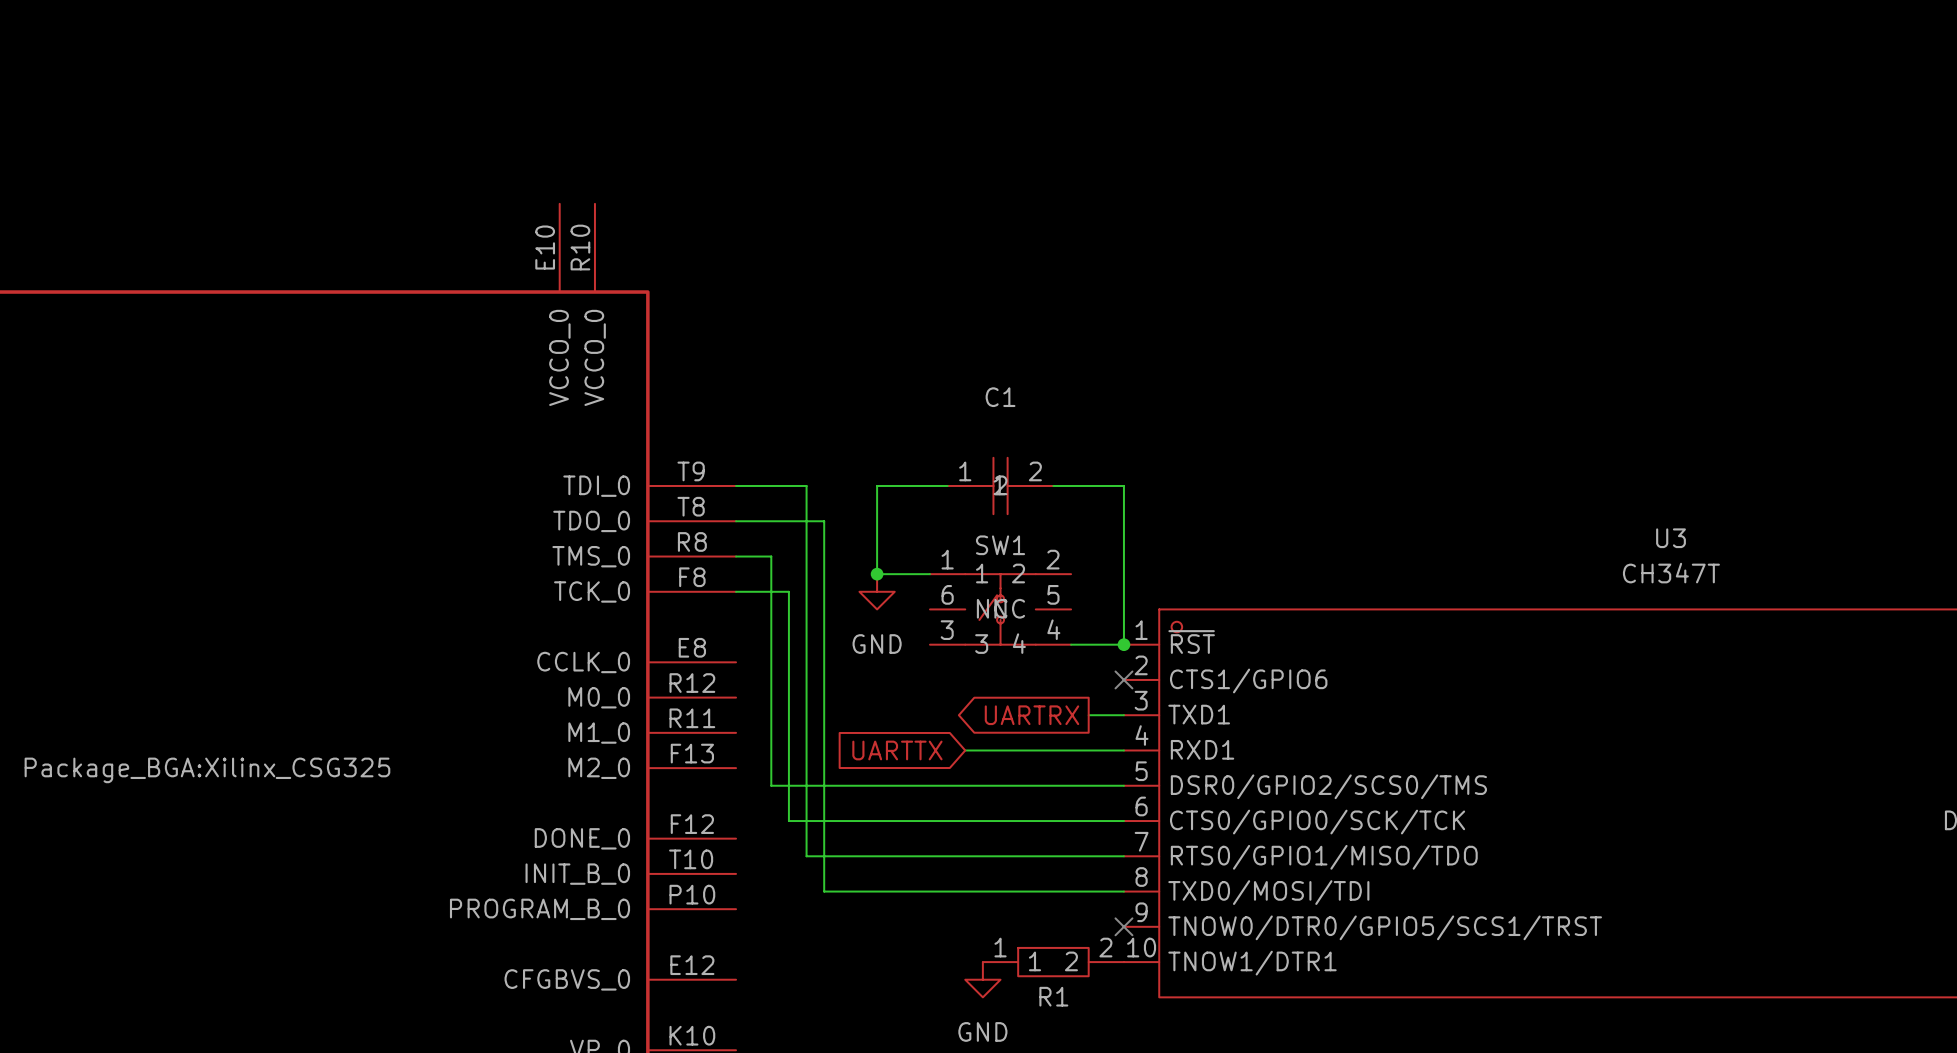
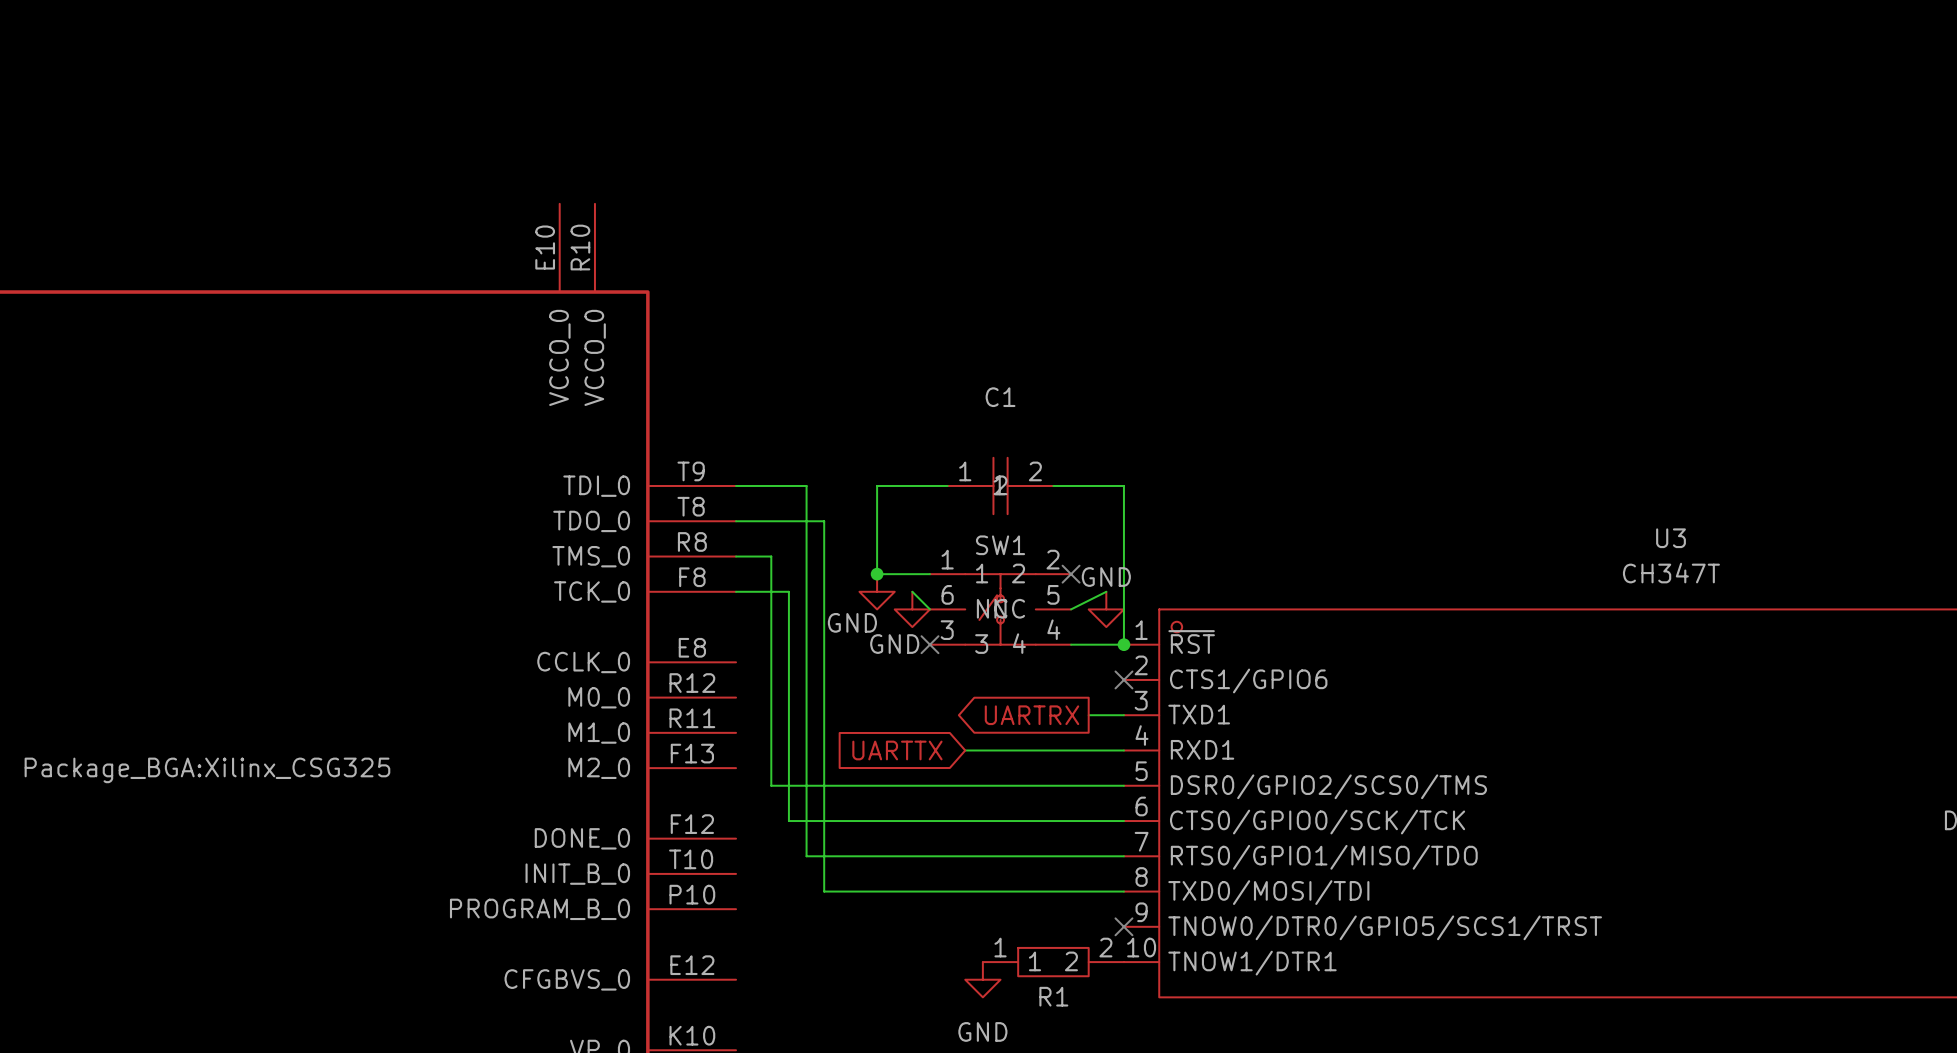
no-connect mark: none -> (1071, 574)
wire: none -> (912, 591) (929, 609)
wire: none -> (1106, 591) (1071, 609)
power symbol: none -> GND (912, 609)
power symbol: none -> GND (1106, 609)
power symbol text position: GND (877, 644) -> GND (852, 622)
no-connect mark: none -> (929, 644)

